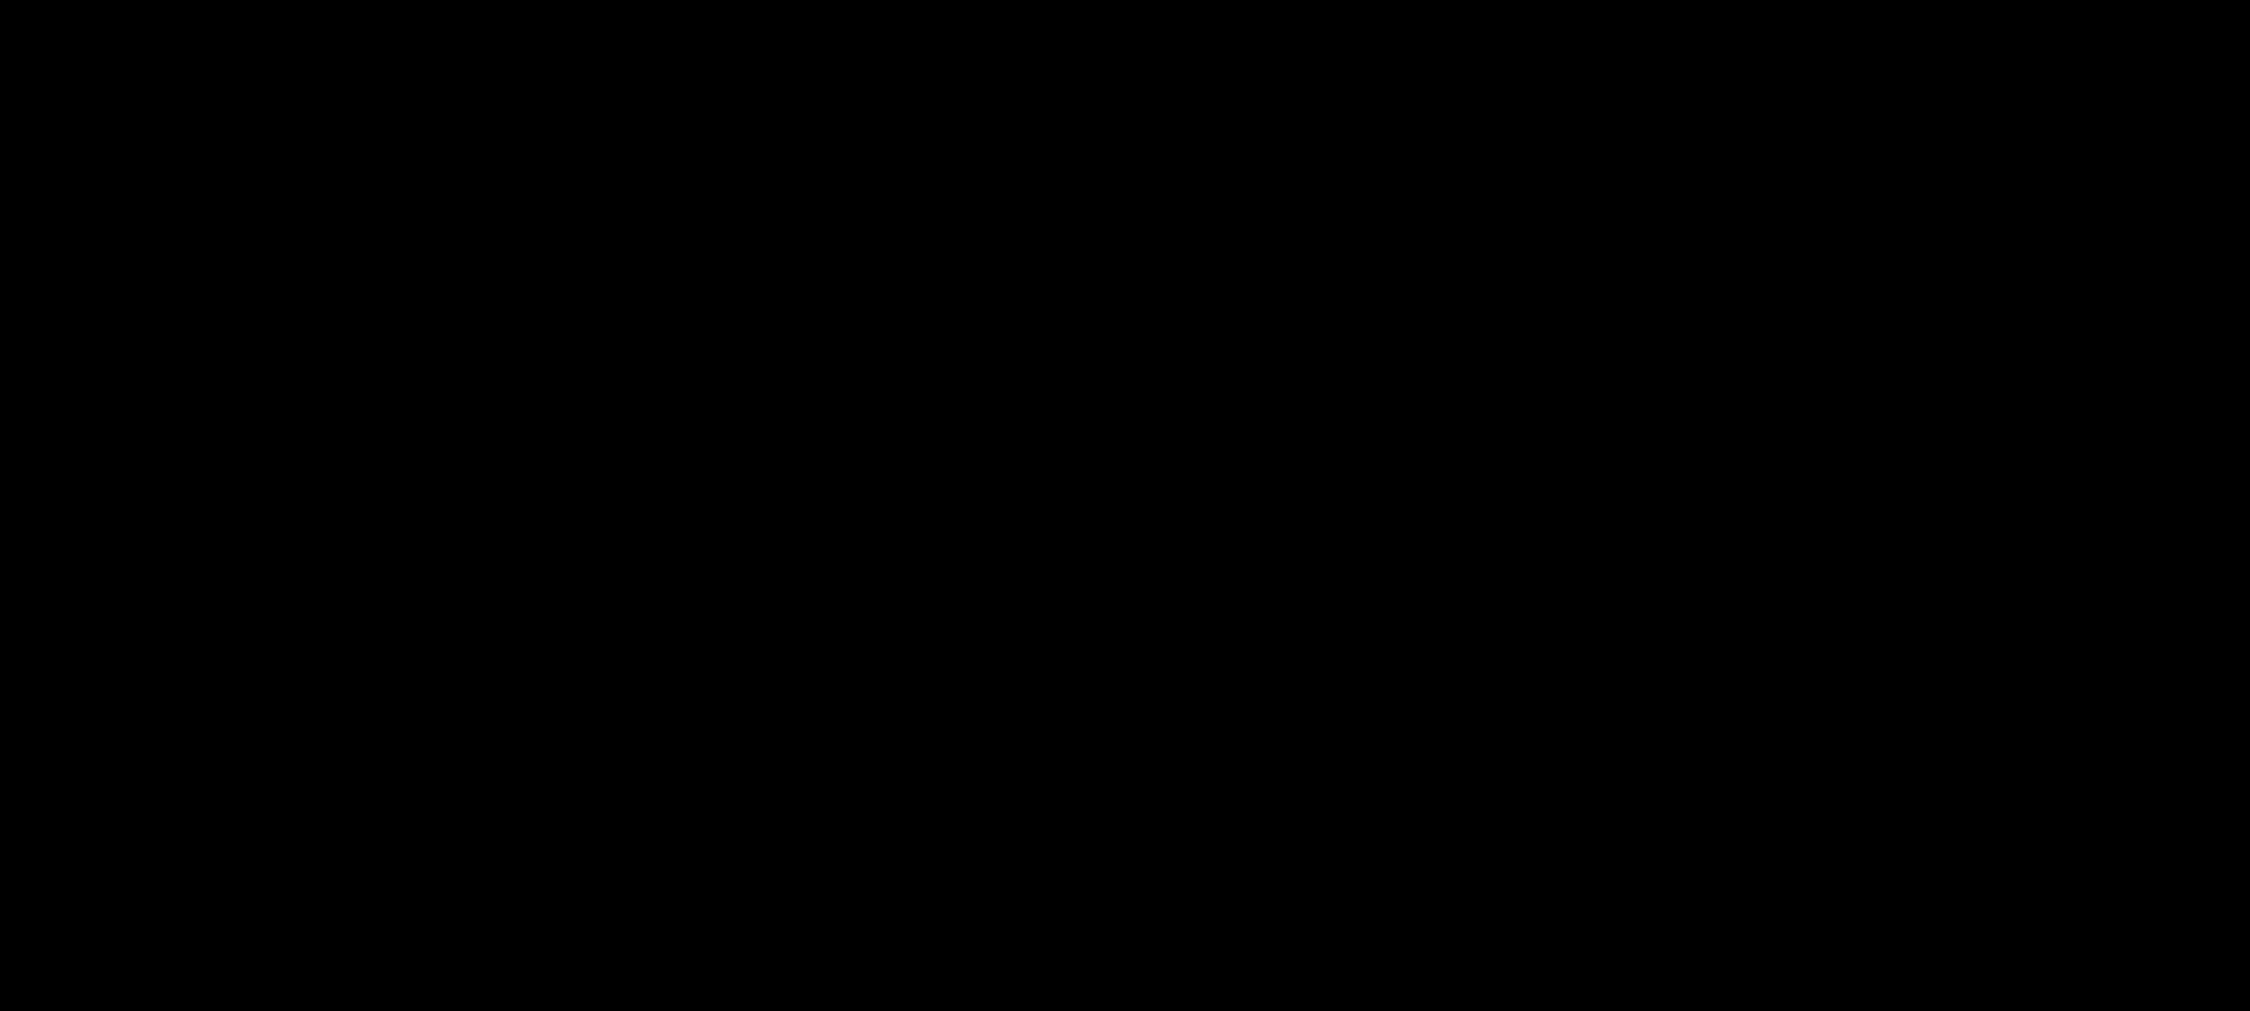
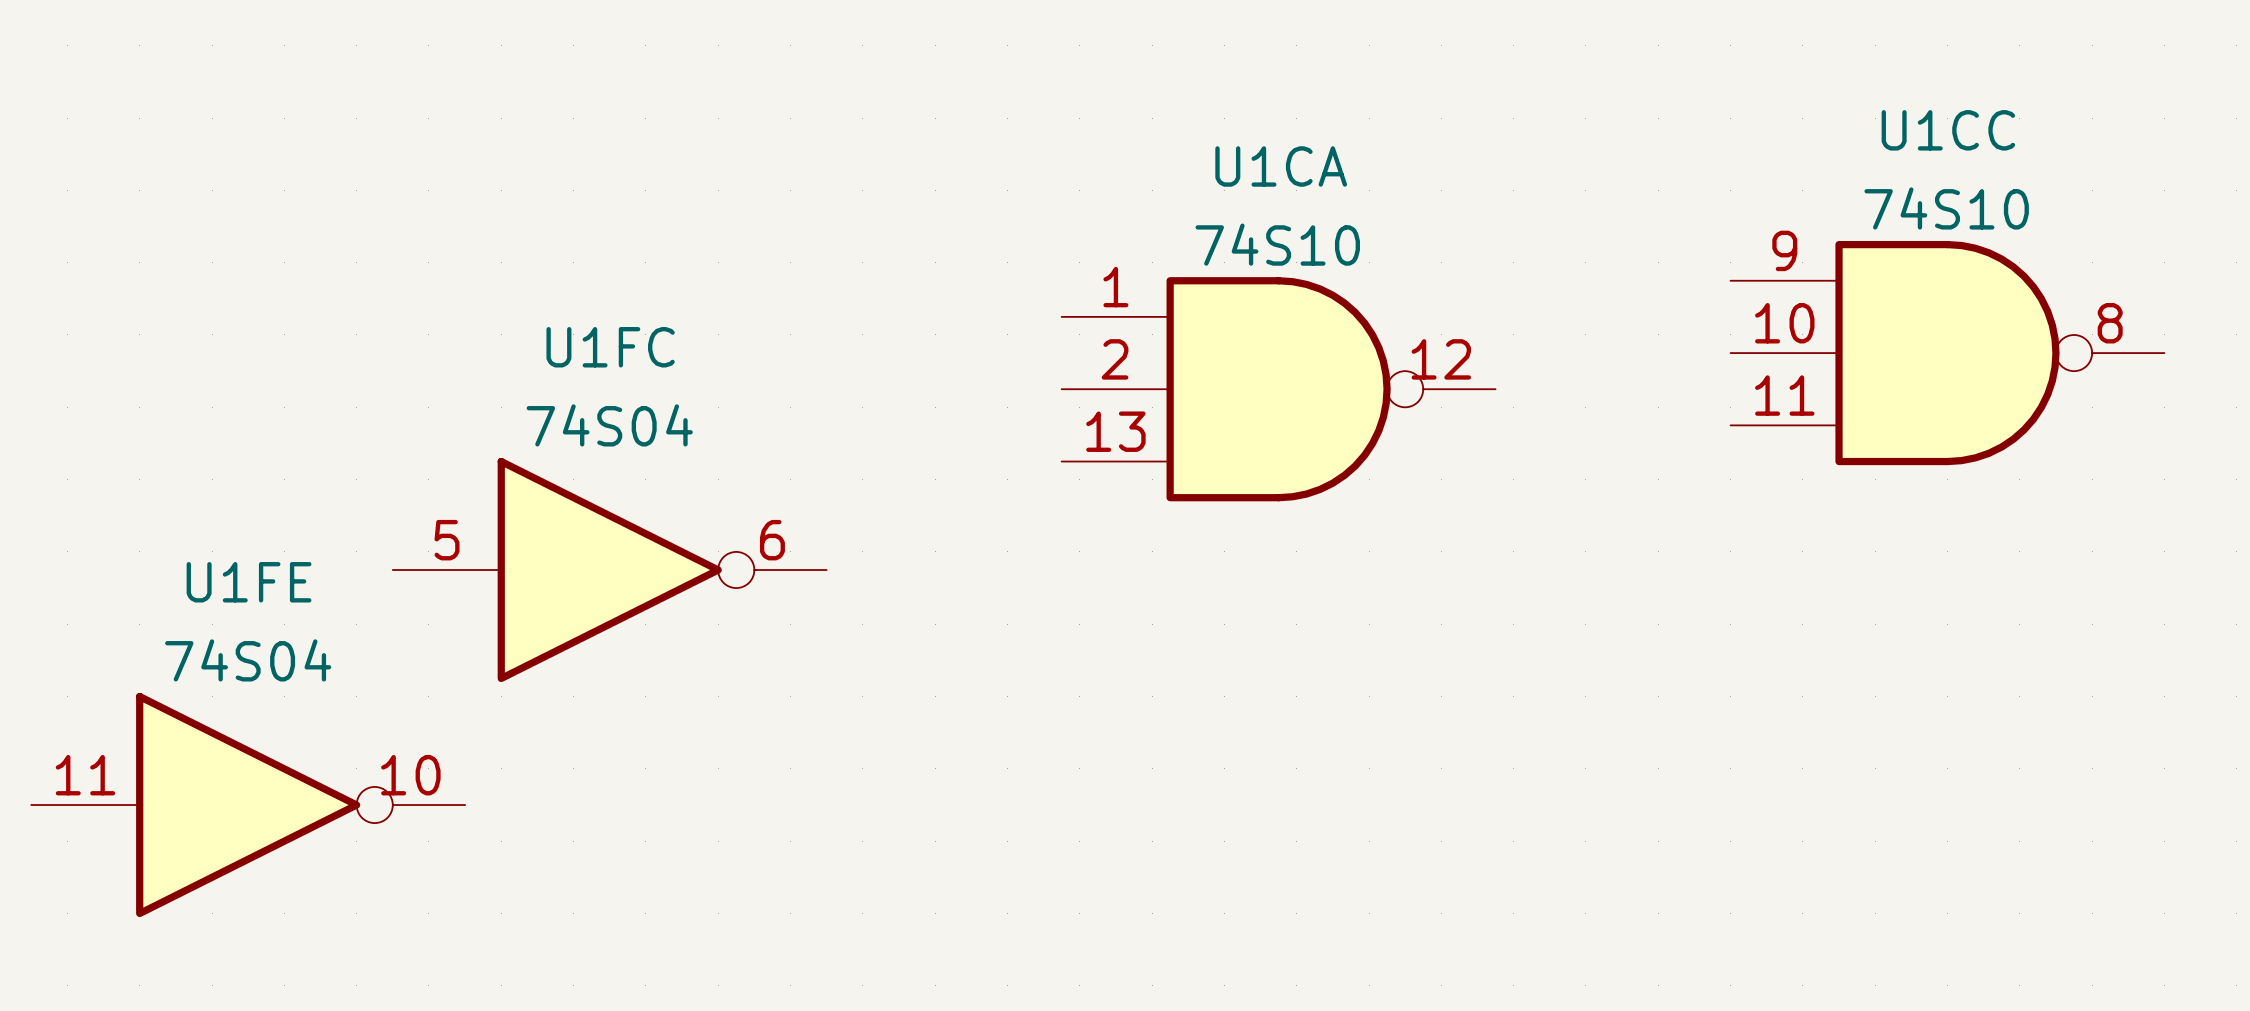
U1CC: none -> 74S10 (1947, 353)
U1CA: none -> 74S10 (1278, 389)
U1FC: none -> 74S04 (609, 570)
U1FE: none -> 74S04 (248, 805)

